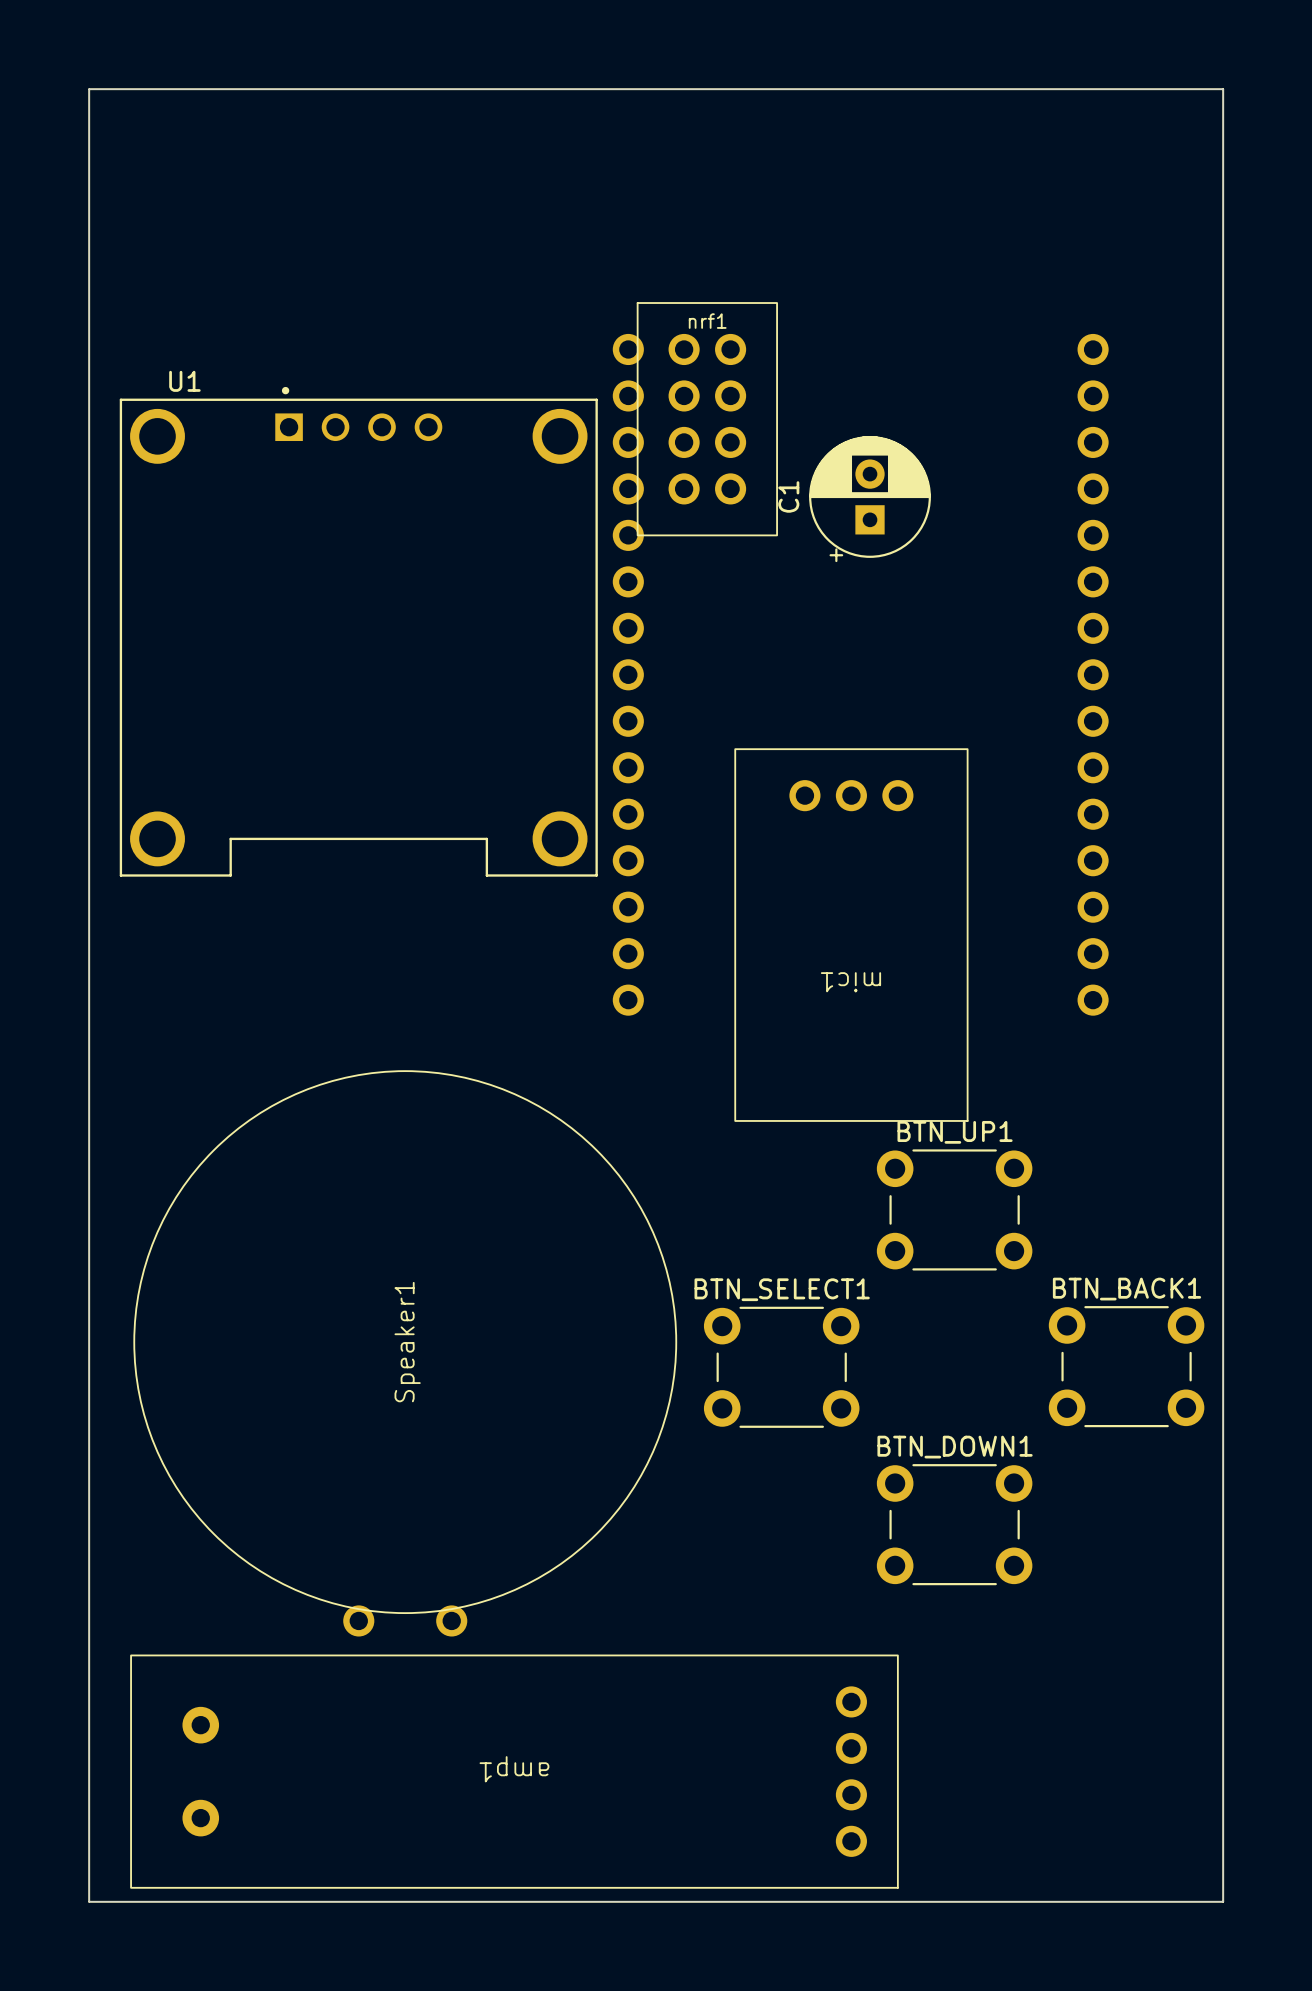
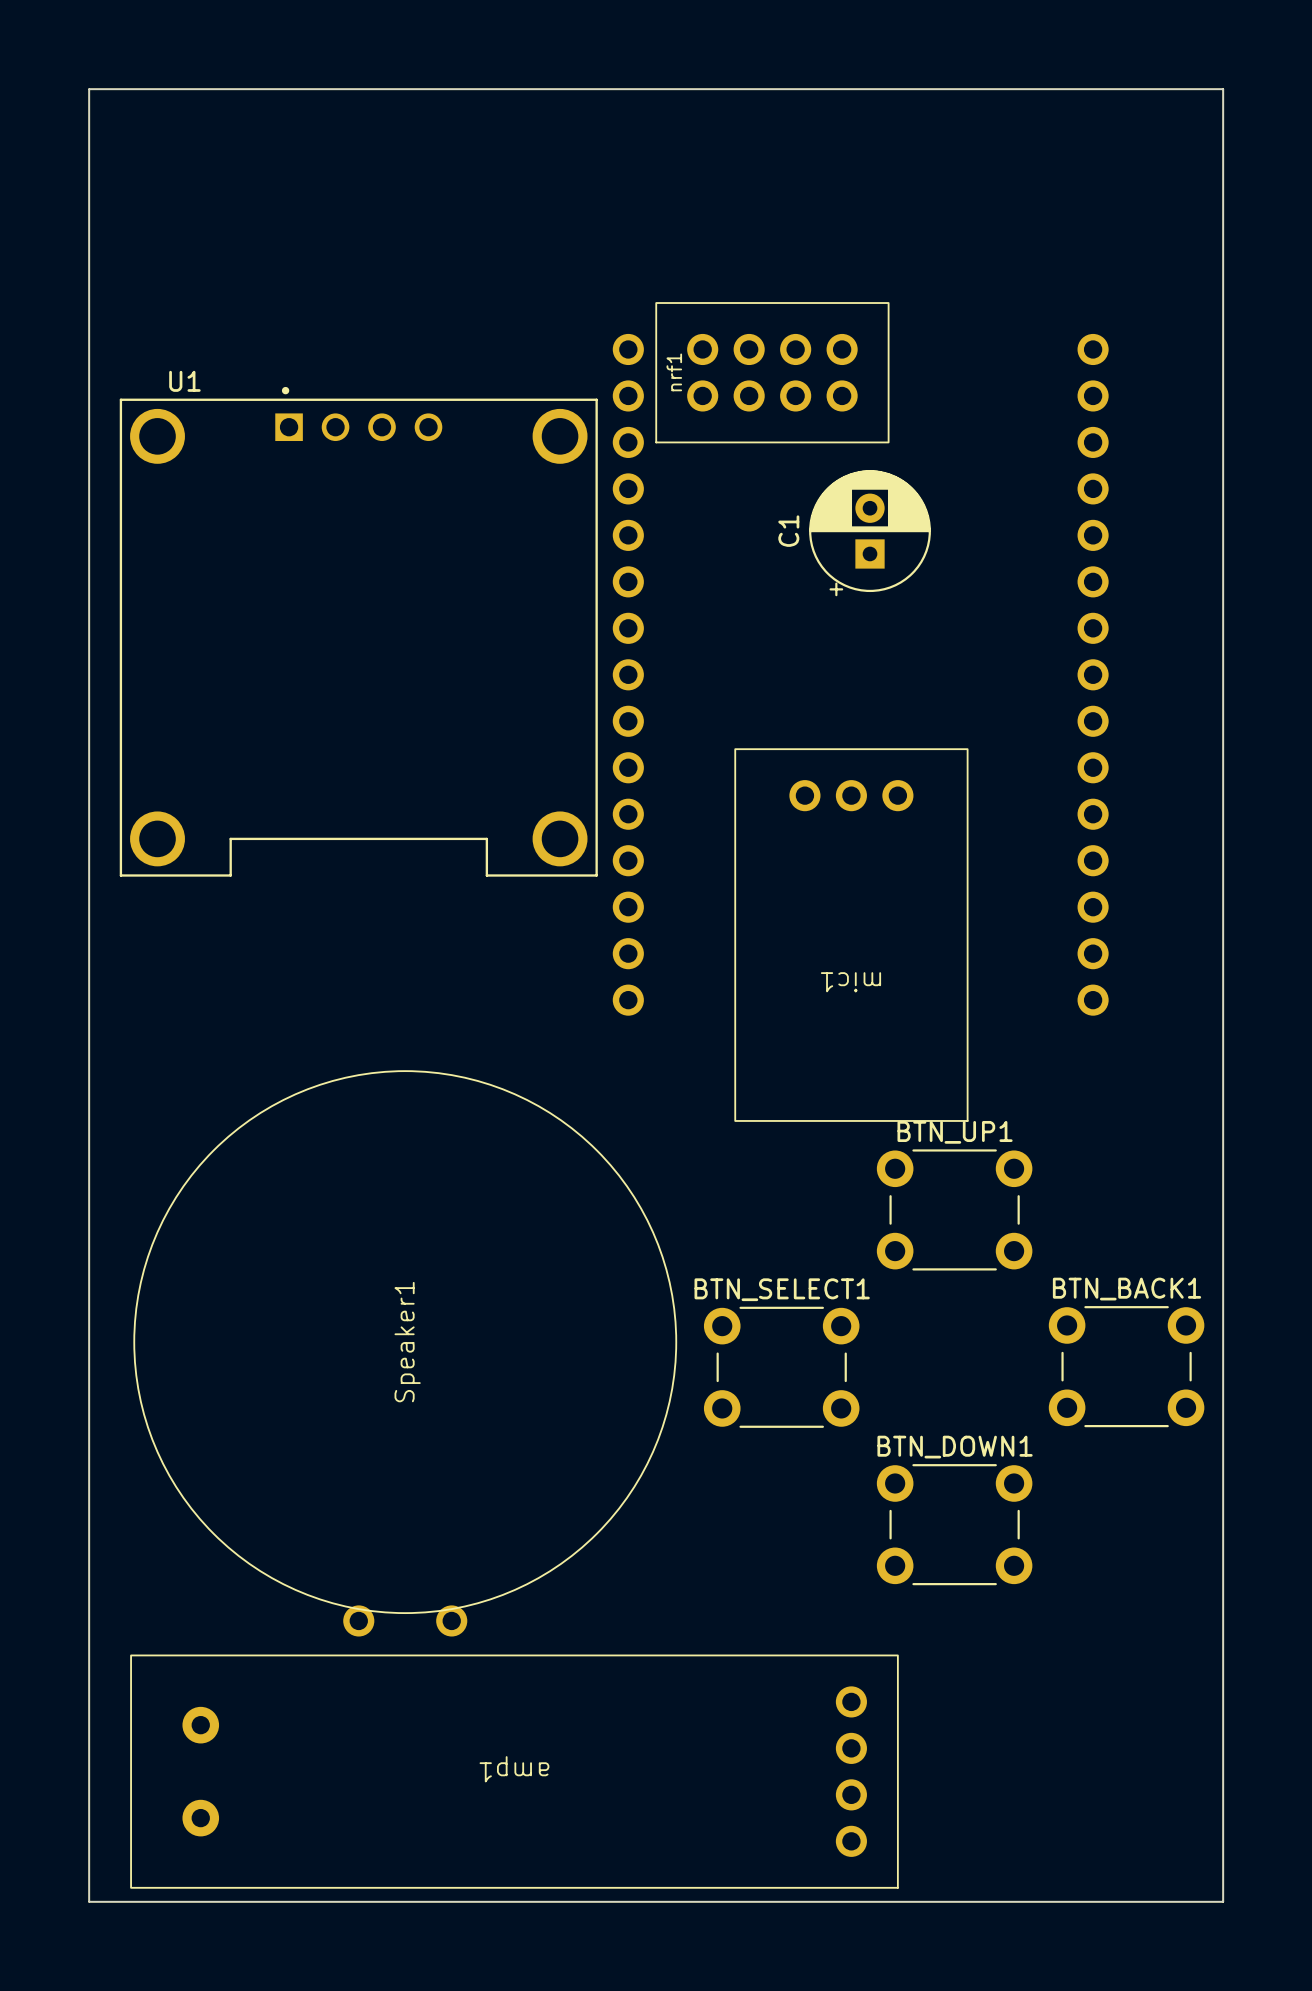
nrf1 name position: nrf1 (707, 321) -> nrf1 (674, 372)
nrf1 rotation: 0° (707, 419) -> 90° clockwise (772, 372)
C1 position: (870, 499) -> (870, 533)

